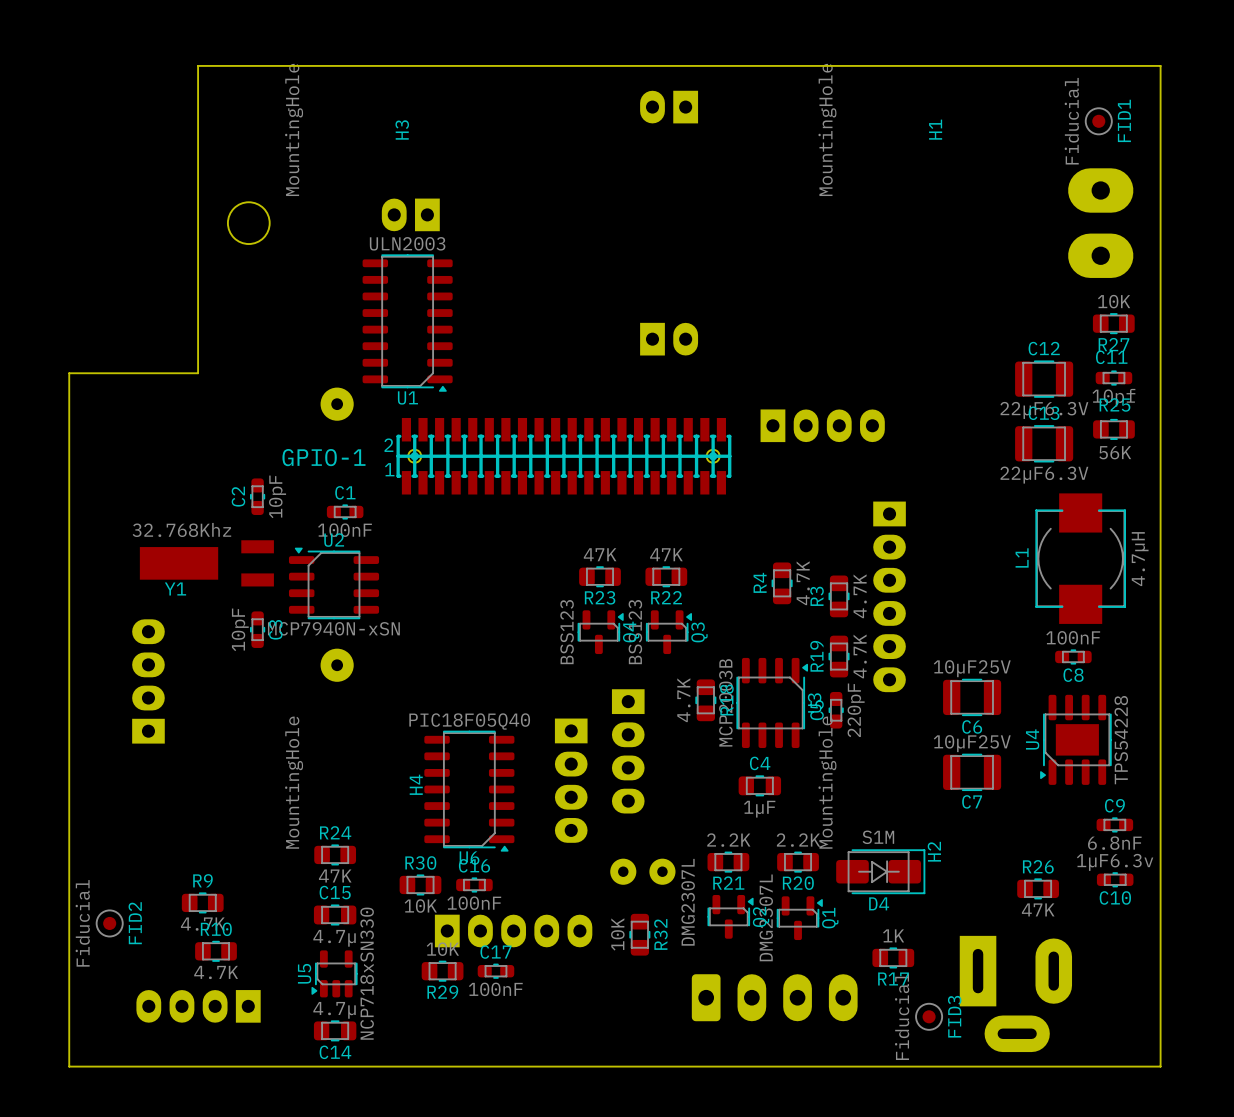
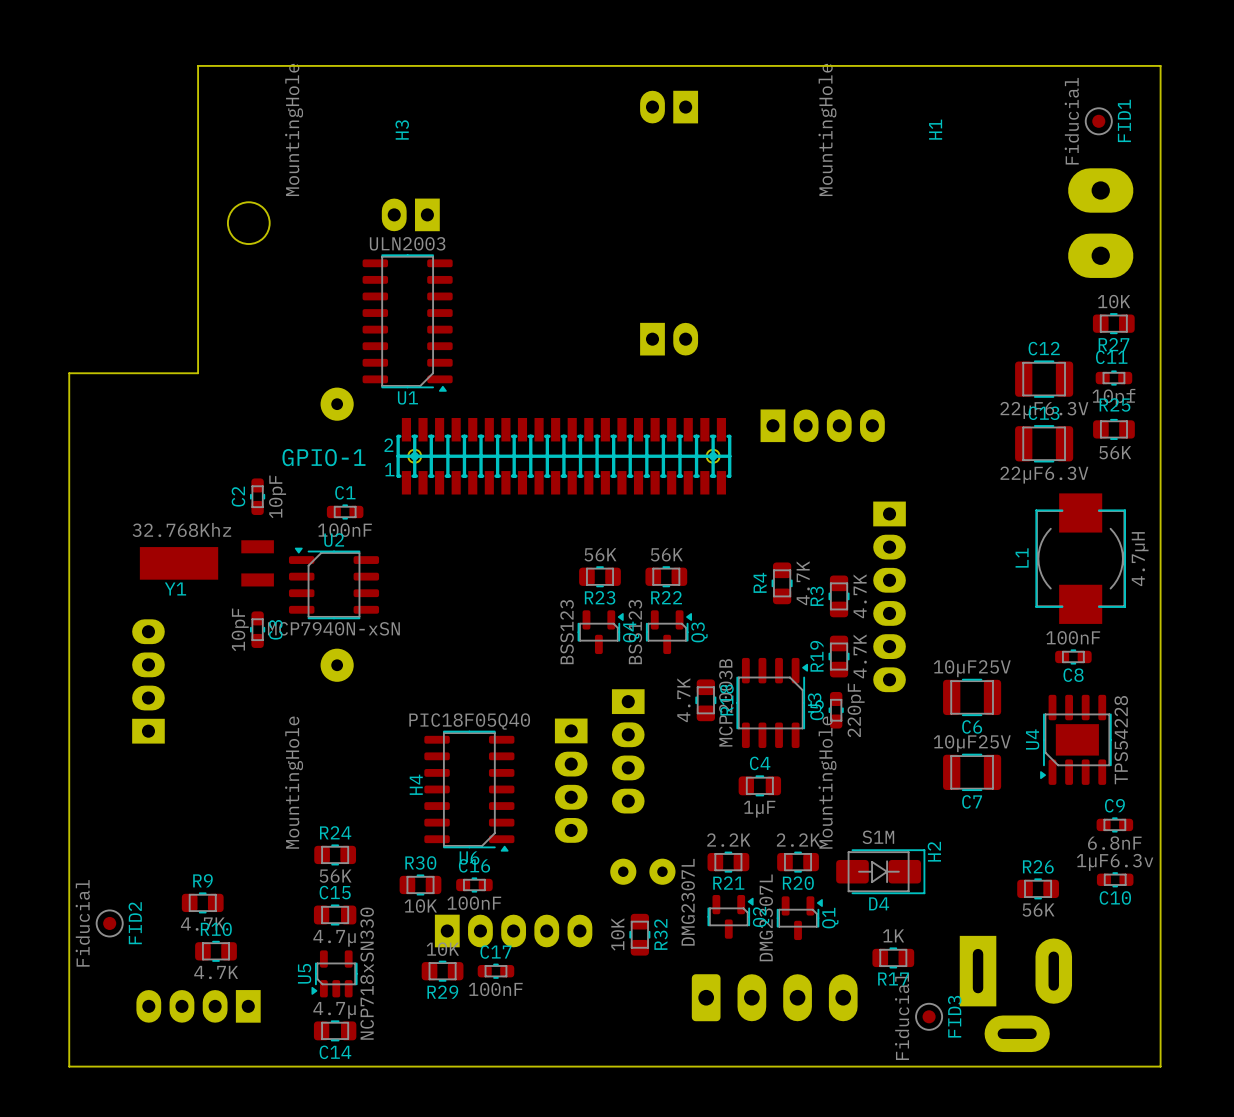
R23 value: 47K (600, 554) -> 56K (600, 554)
R22 value: 47K (666, 554) -> 56K (666, 554)
R24 value: 47K (335, 875) -> 56K (335, 876)
R26 value: 47K (1038, 909) -> 56K (1038, 910)

